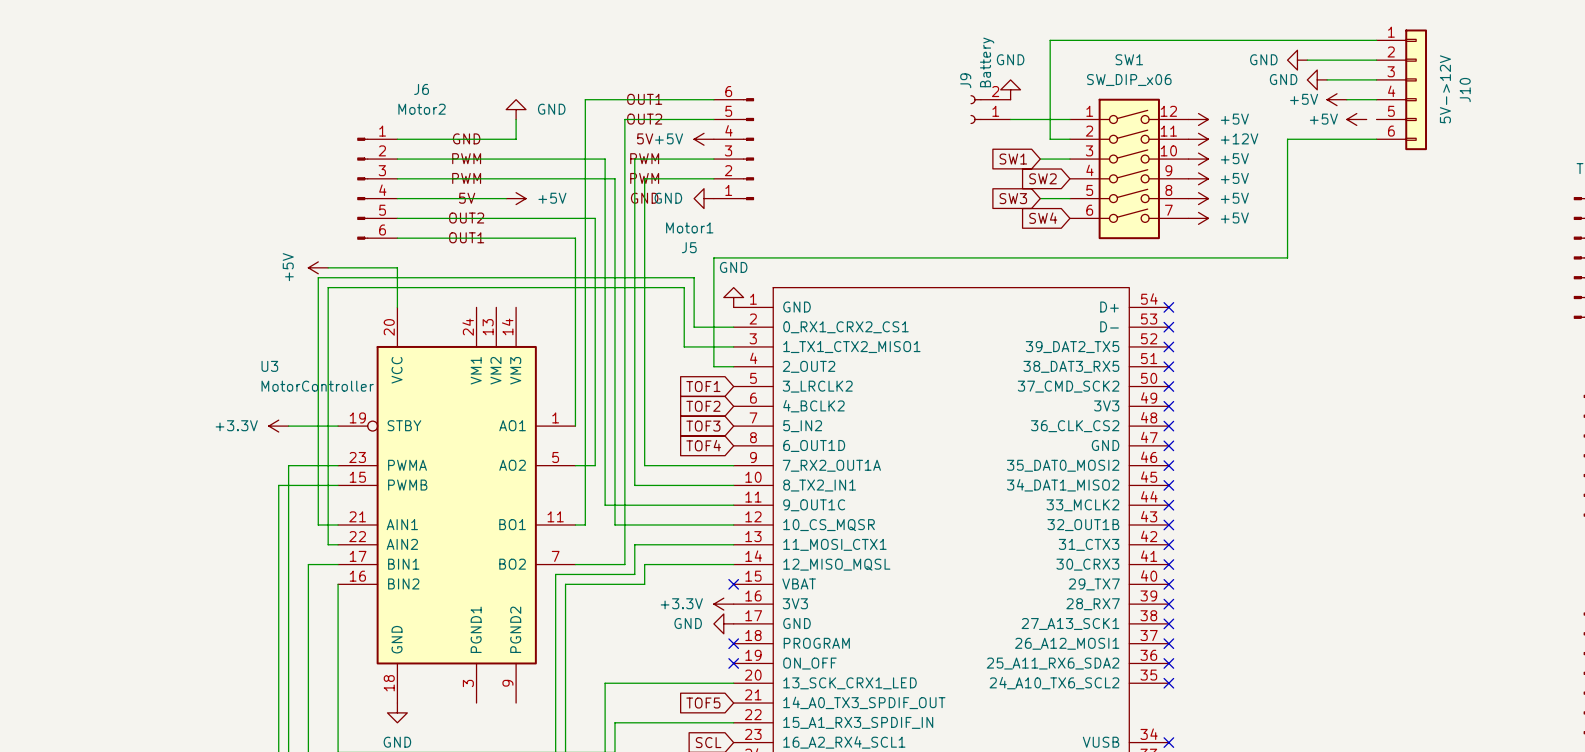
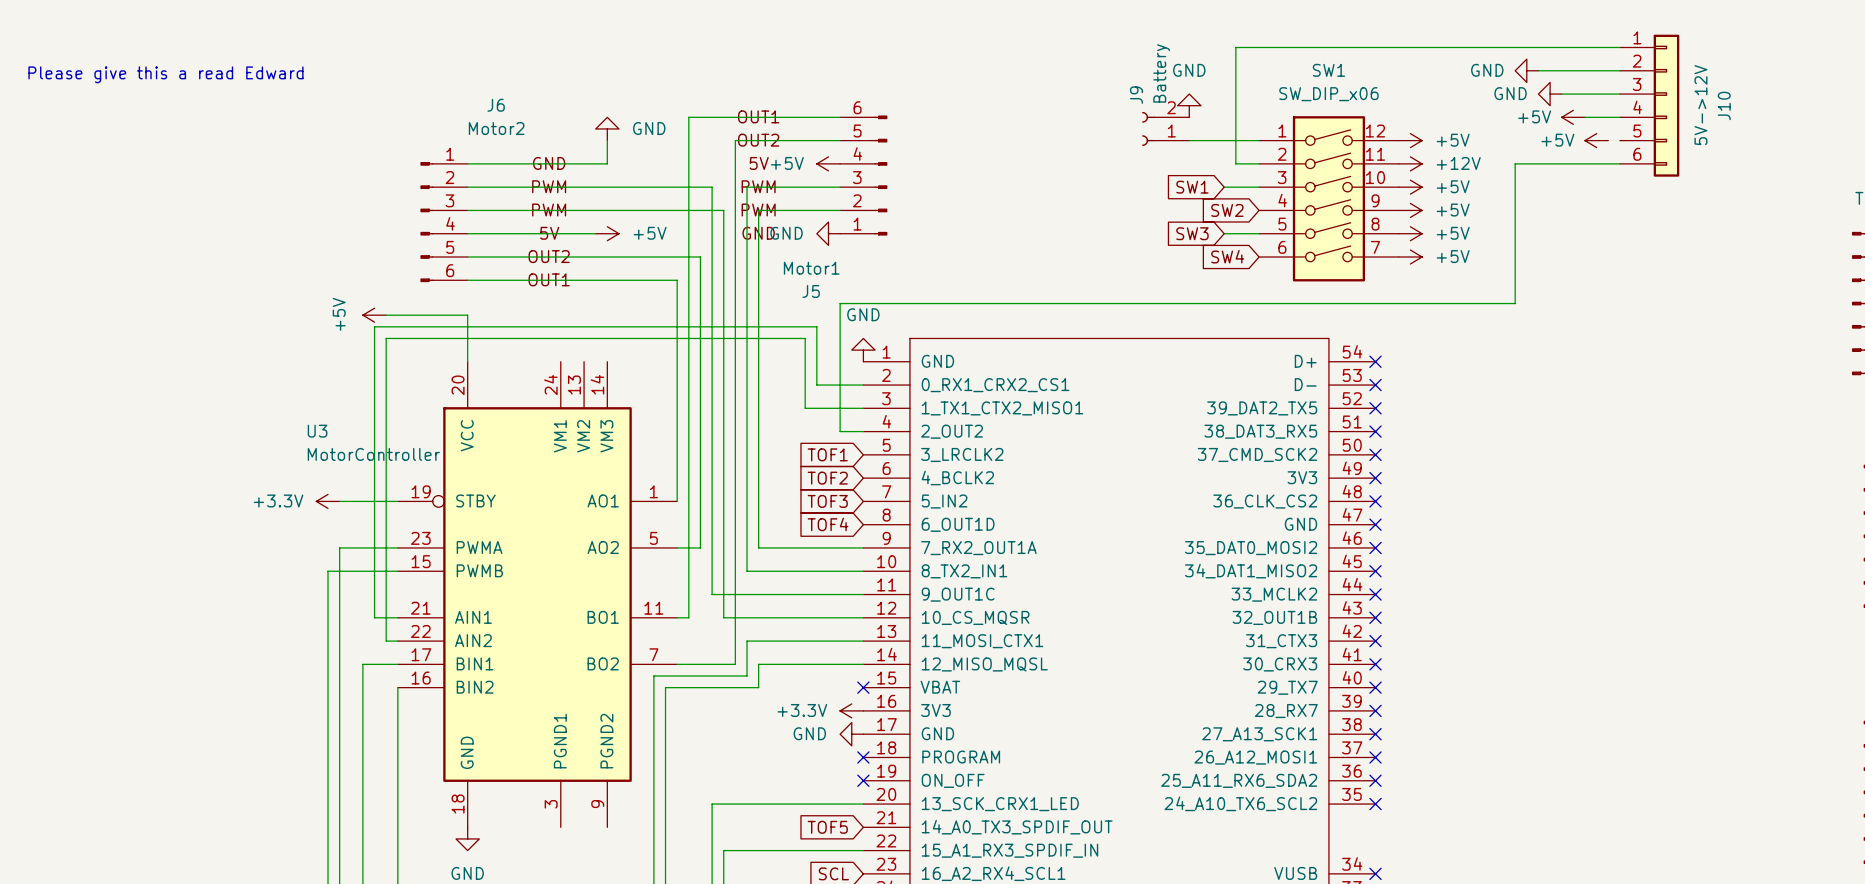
text: none -> Please give this a read Edward (165, 74)

